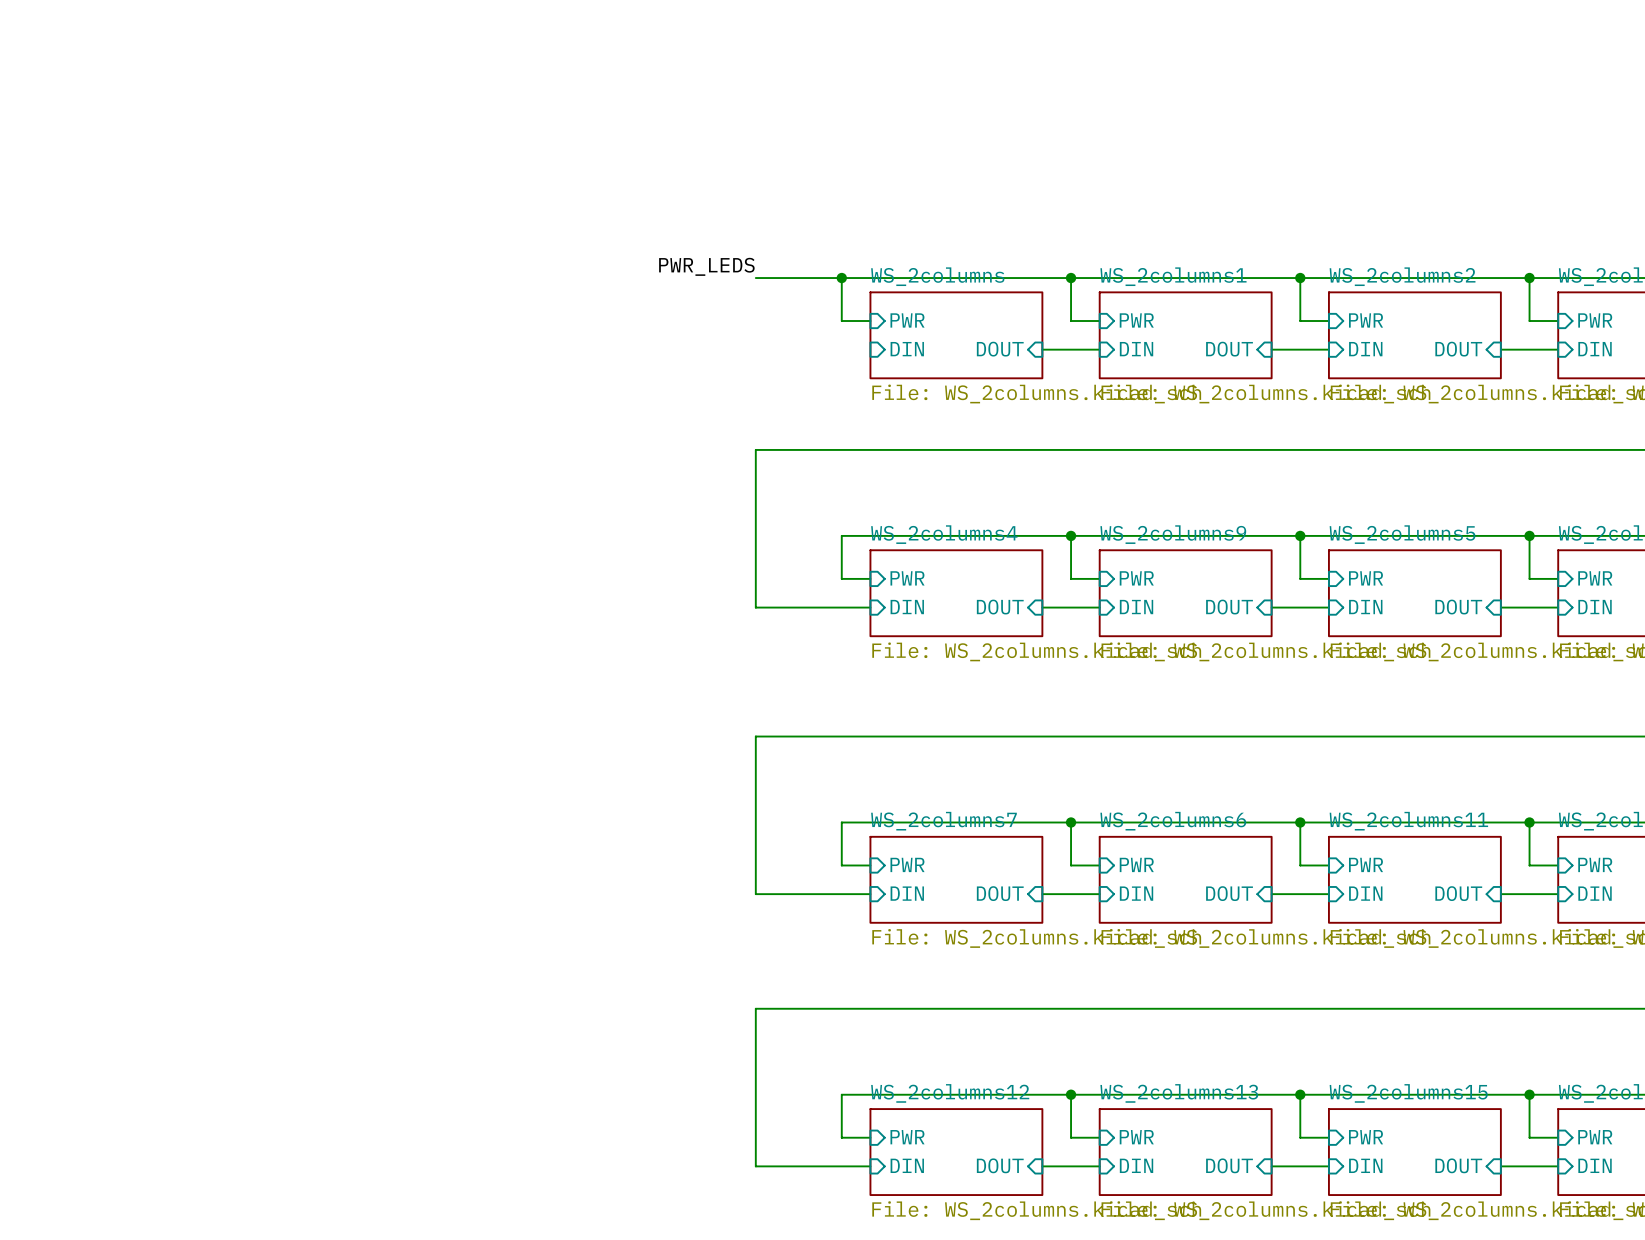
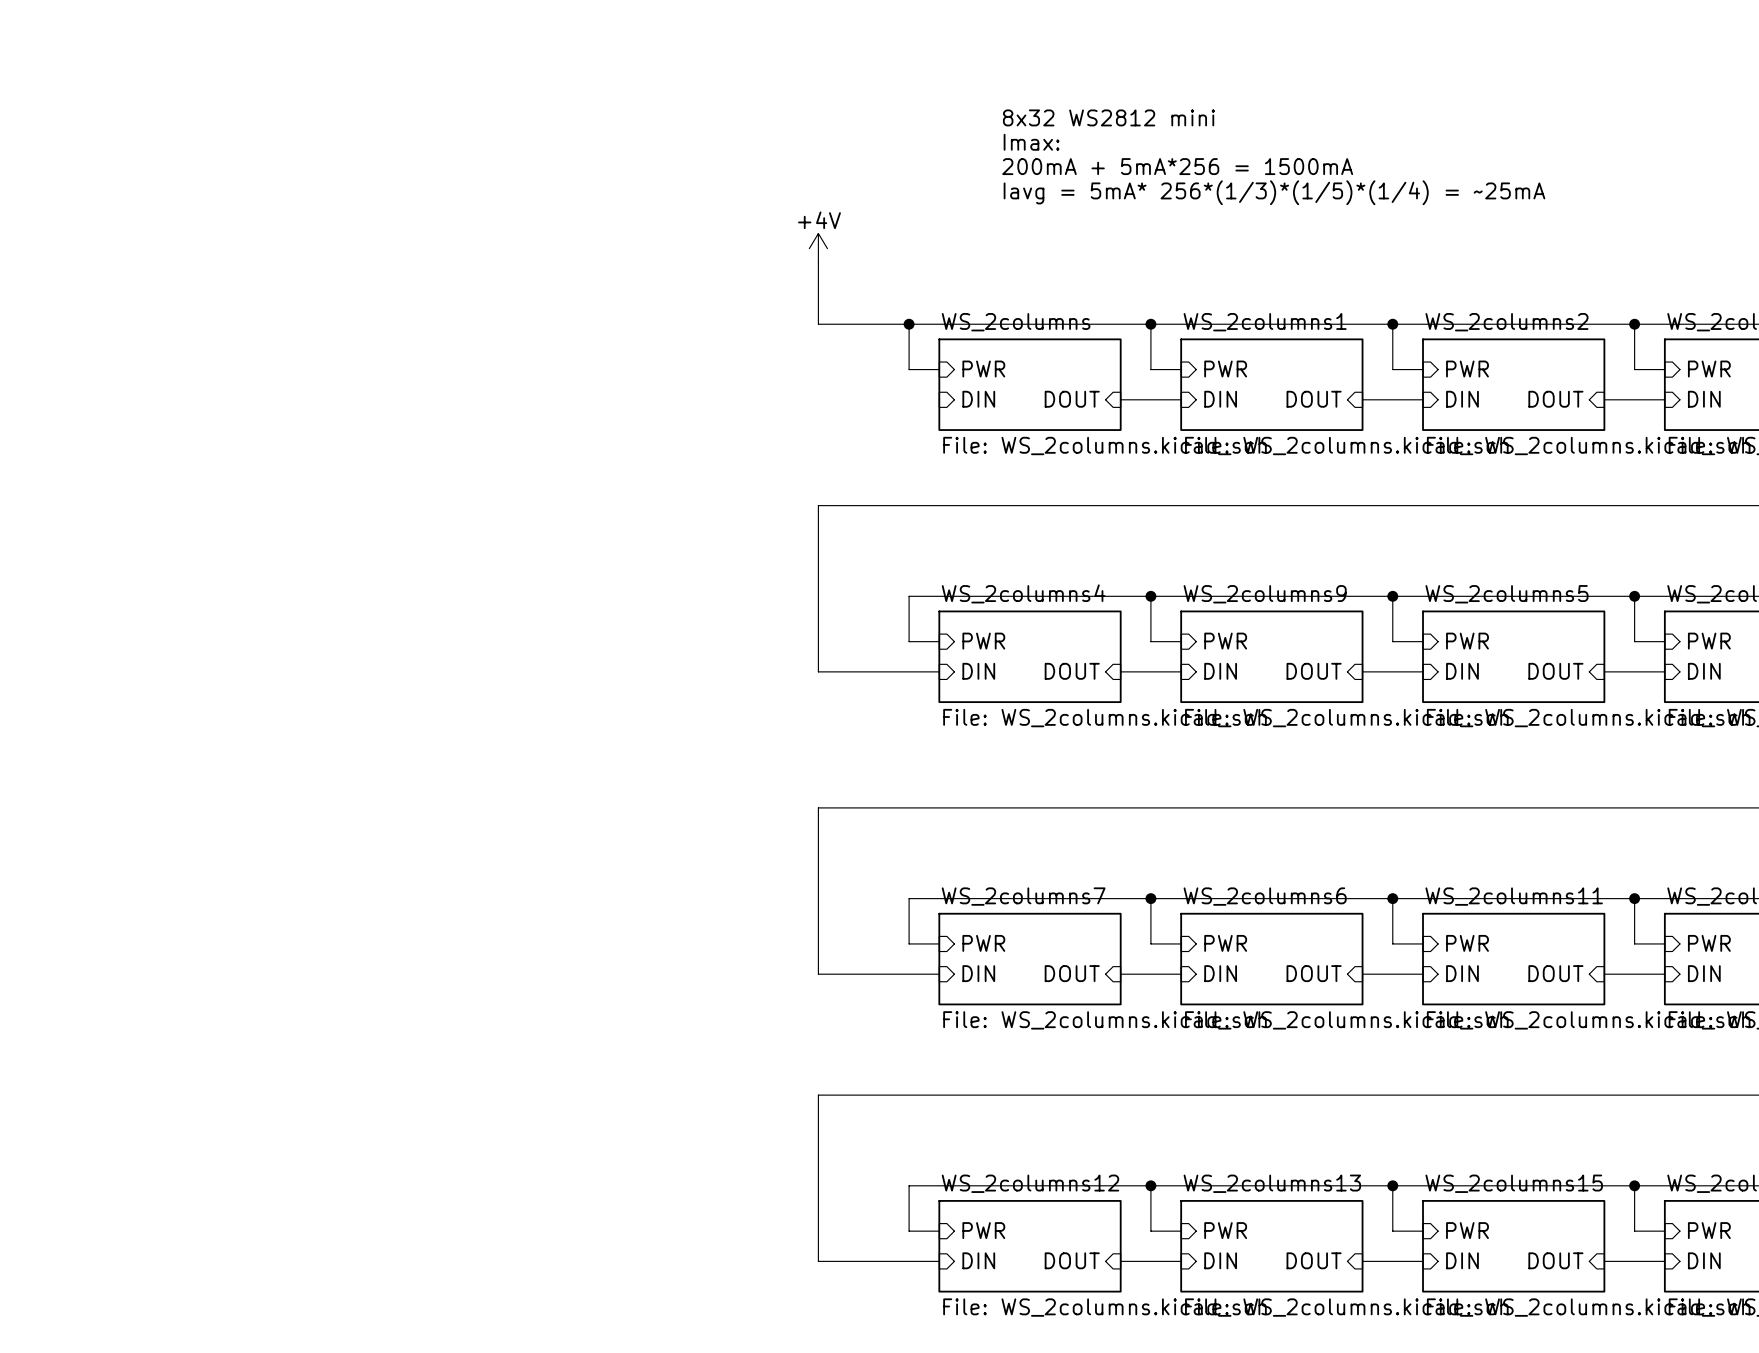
text: none -> 8x32 WS2812 mini (1108, 117)
text: none -> Imax: (1031, 142)
text: none -> 200mA + 5mA*256 = 1500mA (1177, 166)
text: none -> Iavg = 5mA* 256*(1/3)*(1/5)*(1/4) = ~25mA (1274, 192)
power symbol: none -> +4V (818, 248)
wire: none -> (818, 263) (818, 324)
label: PWR_LEDS (706, 266) -> none

